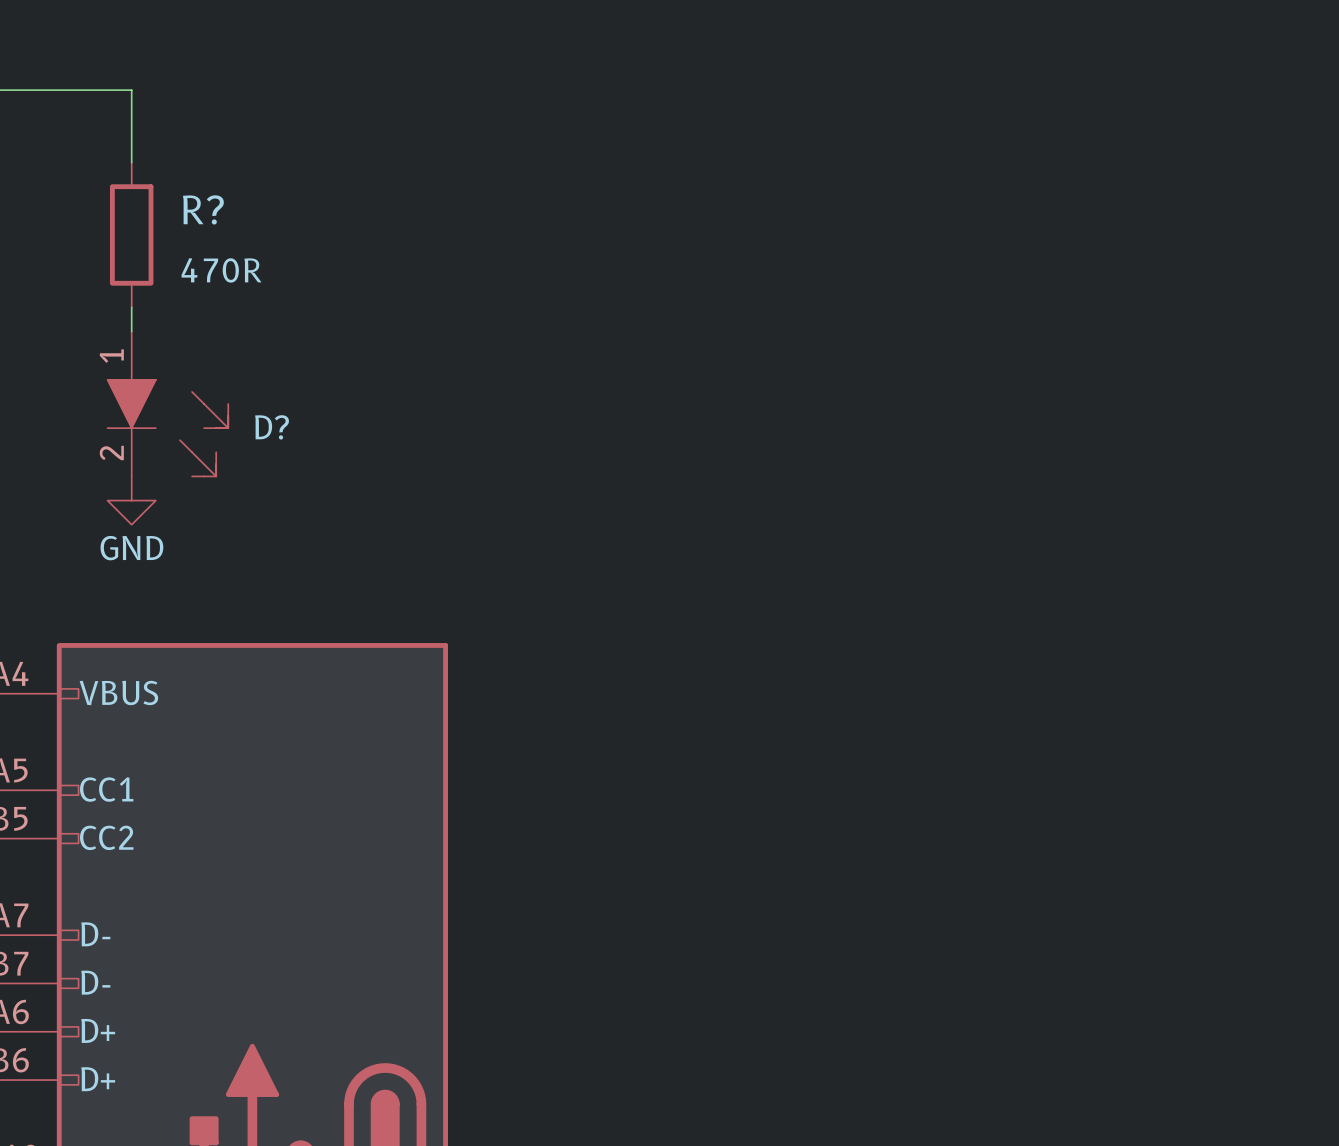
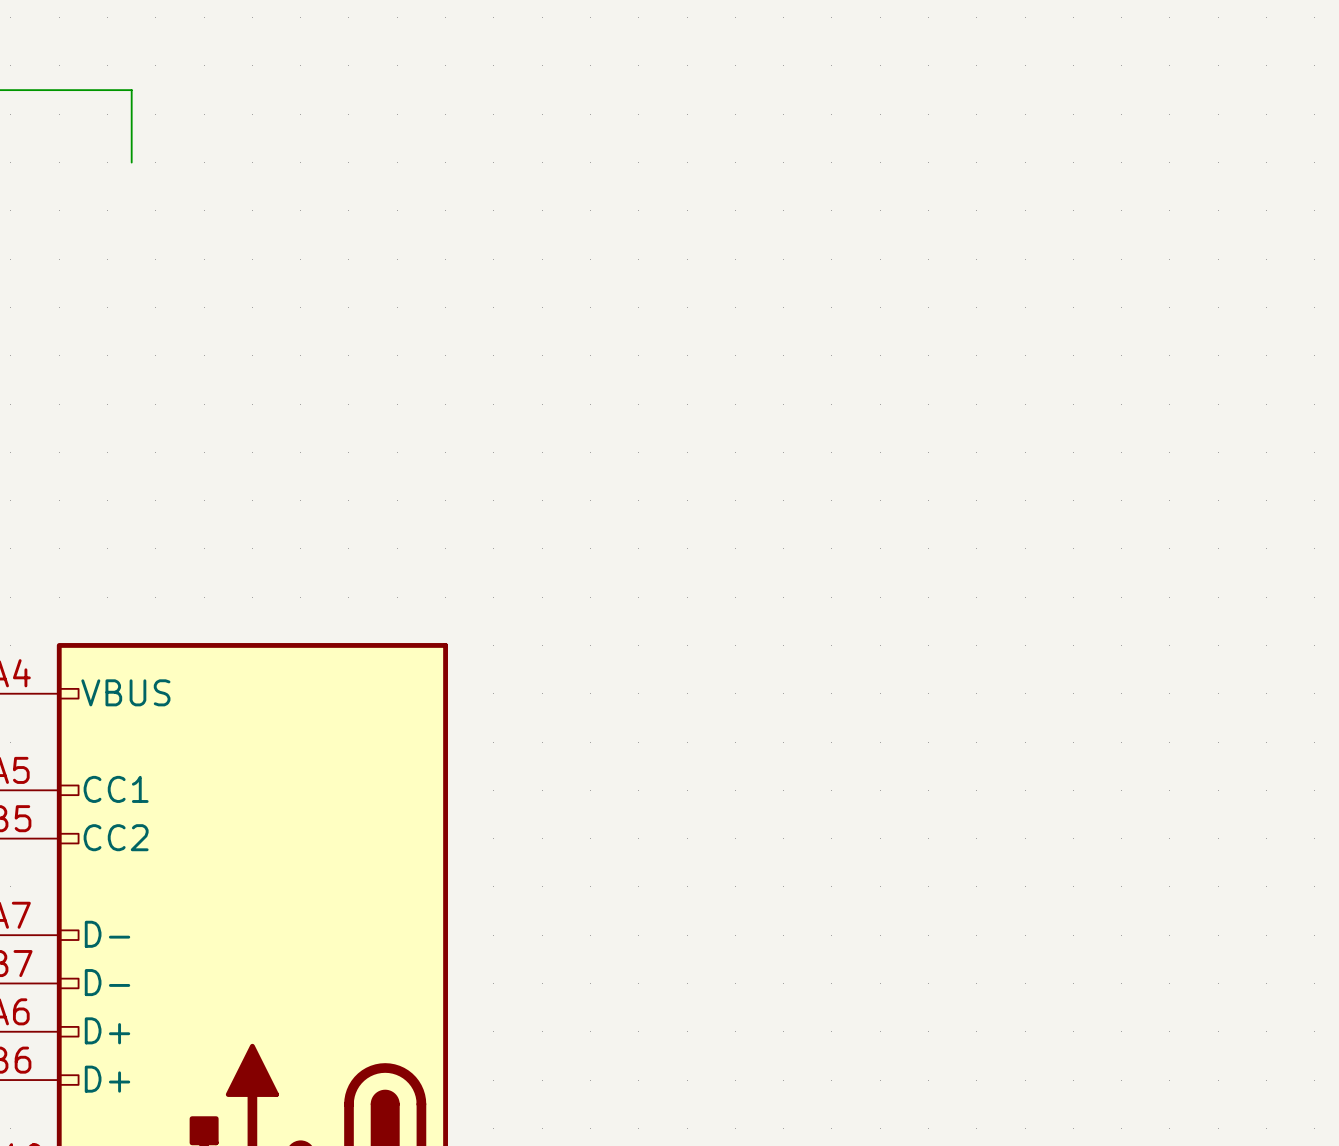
R?: (131, 234) -> none
wire: (131, 307) (131, 331) -> none
D?: (167, 404) -> none
power symbol: GND (131, 500) -> none

